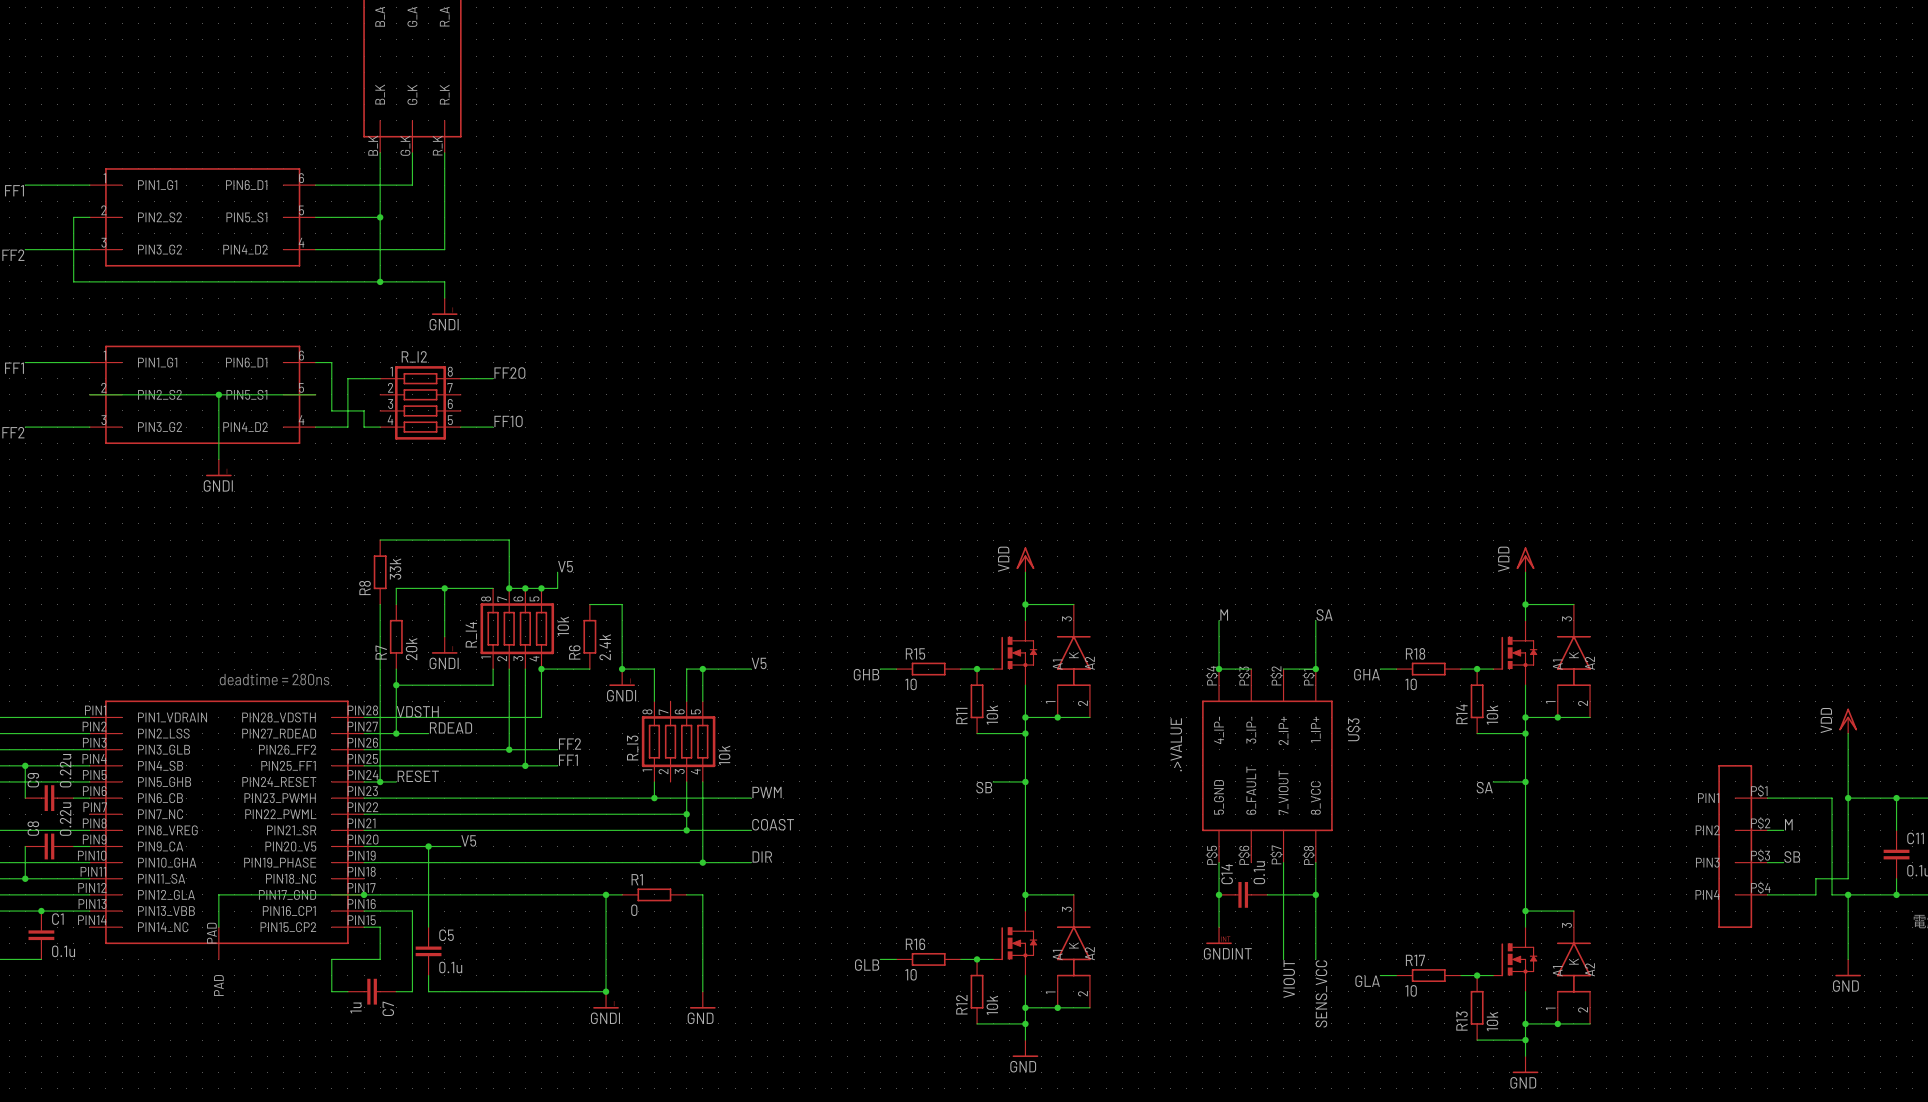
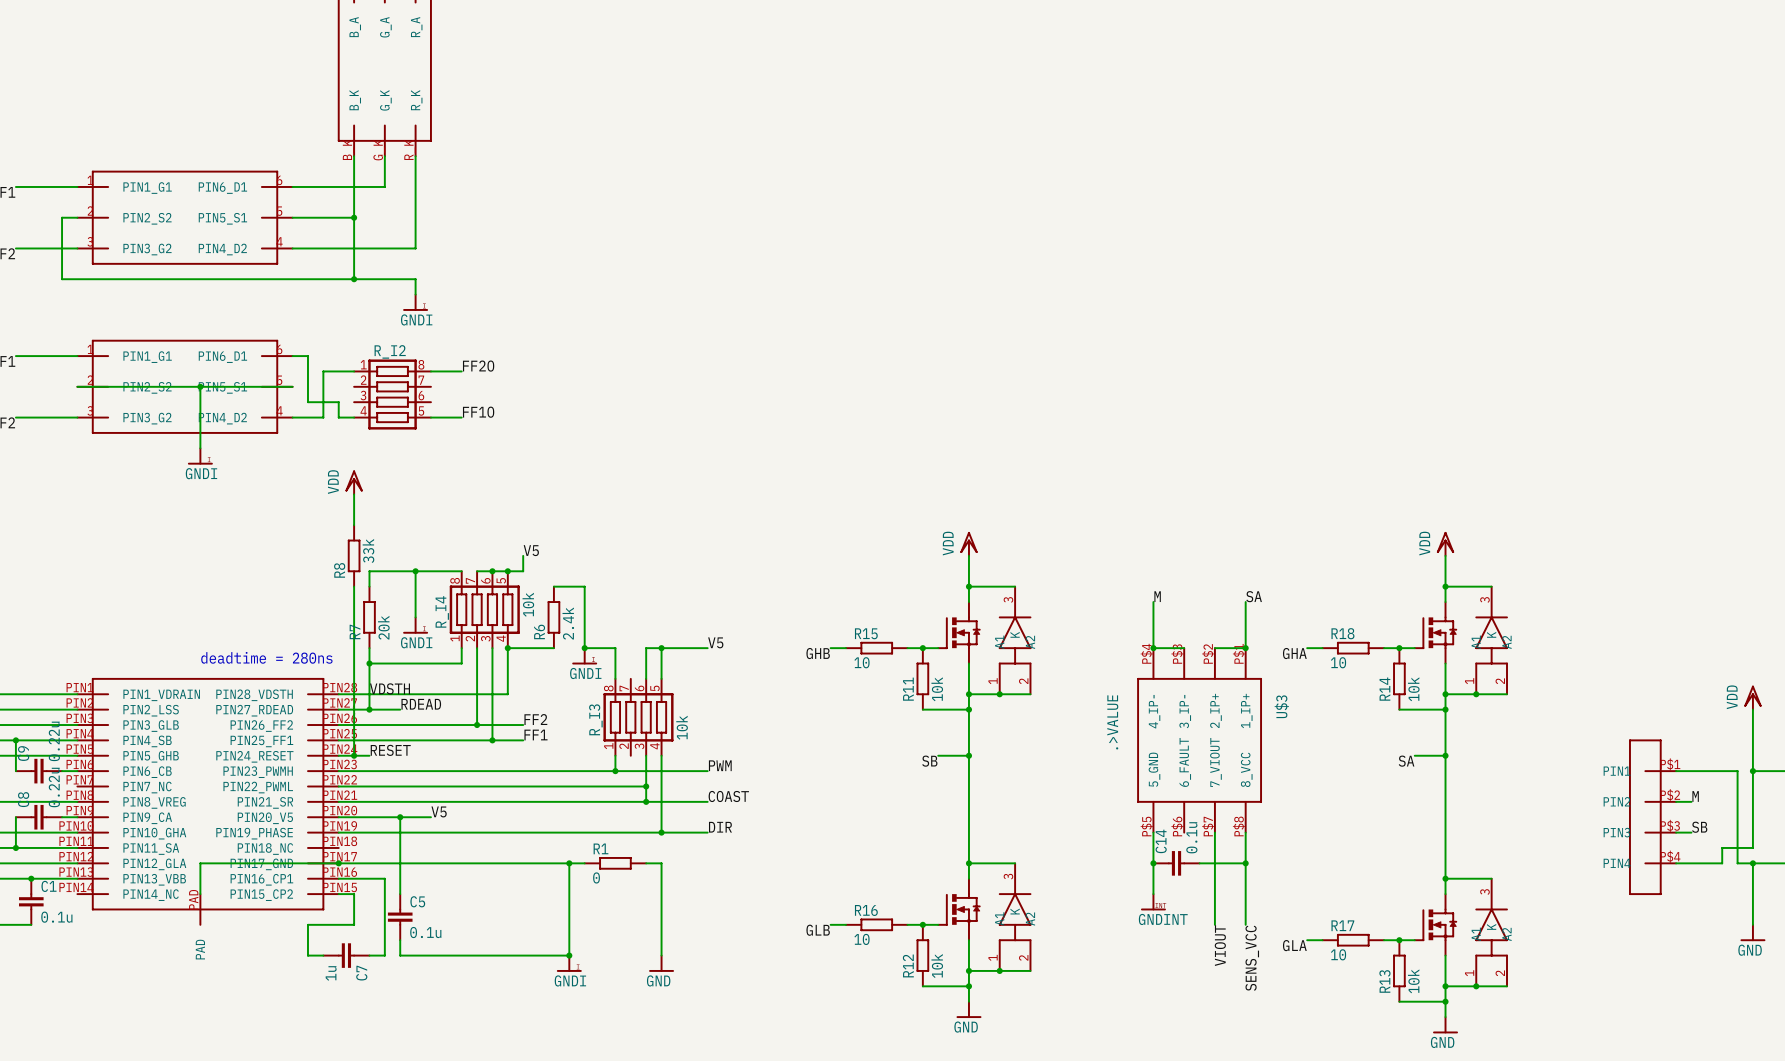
power symbol: none -> VDD (354, 482)
wire: (380, 540) (509, 540) (509, 588) -> (354, 525) (354, 494)
junction: (509, 588) -> none

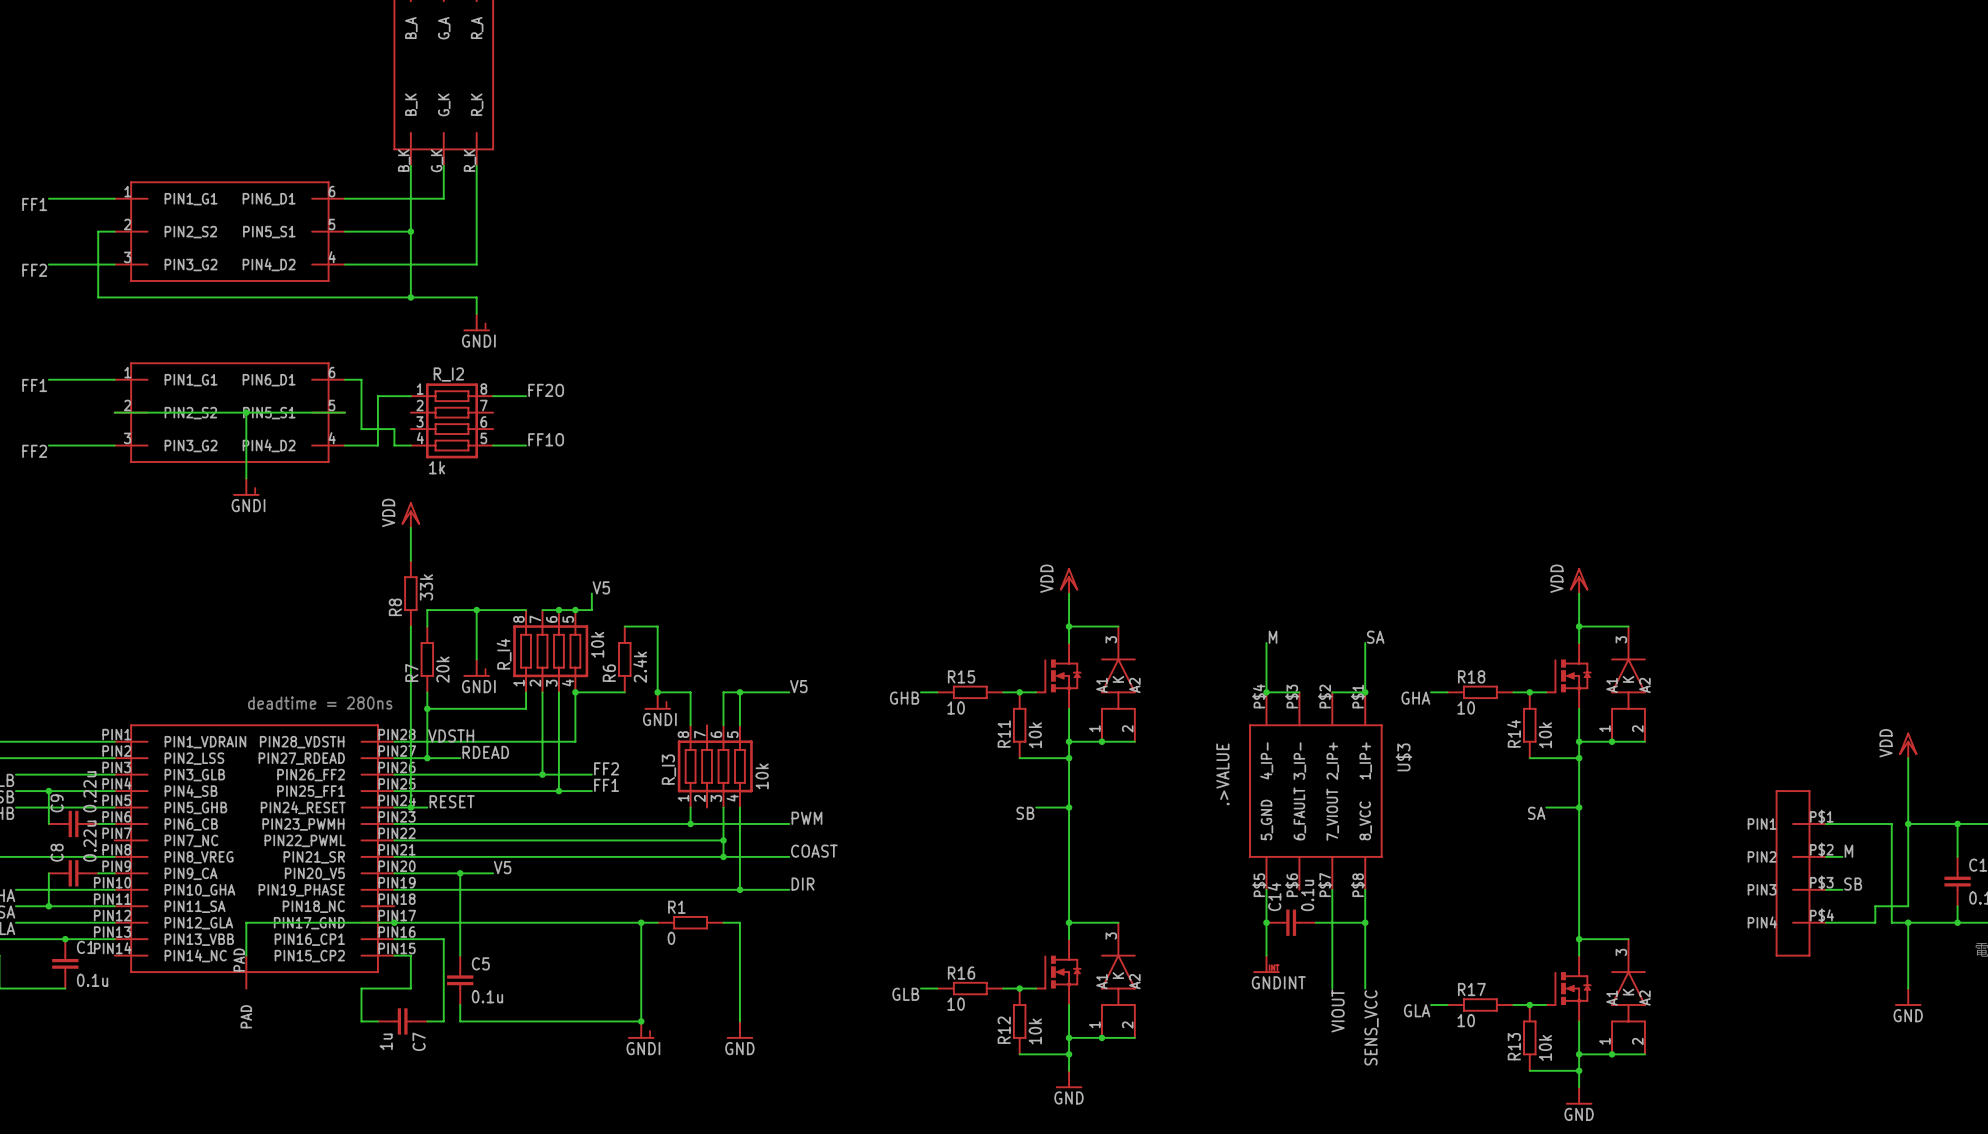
R_I2 value: none -> 1k (437, 467)

